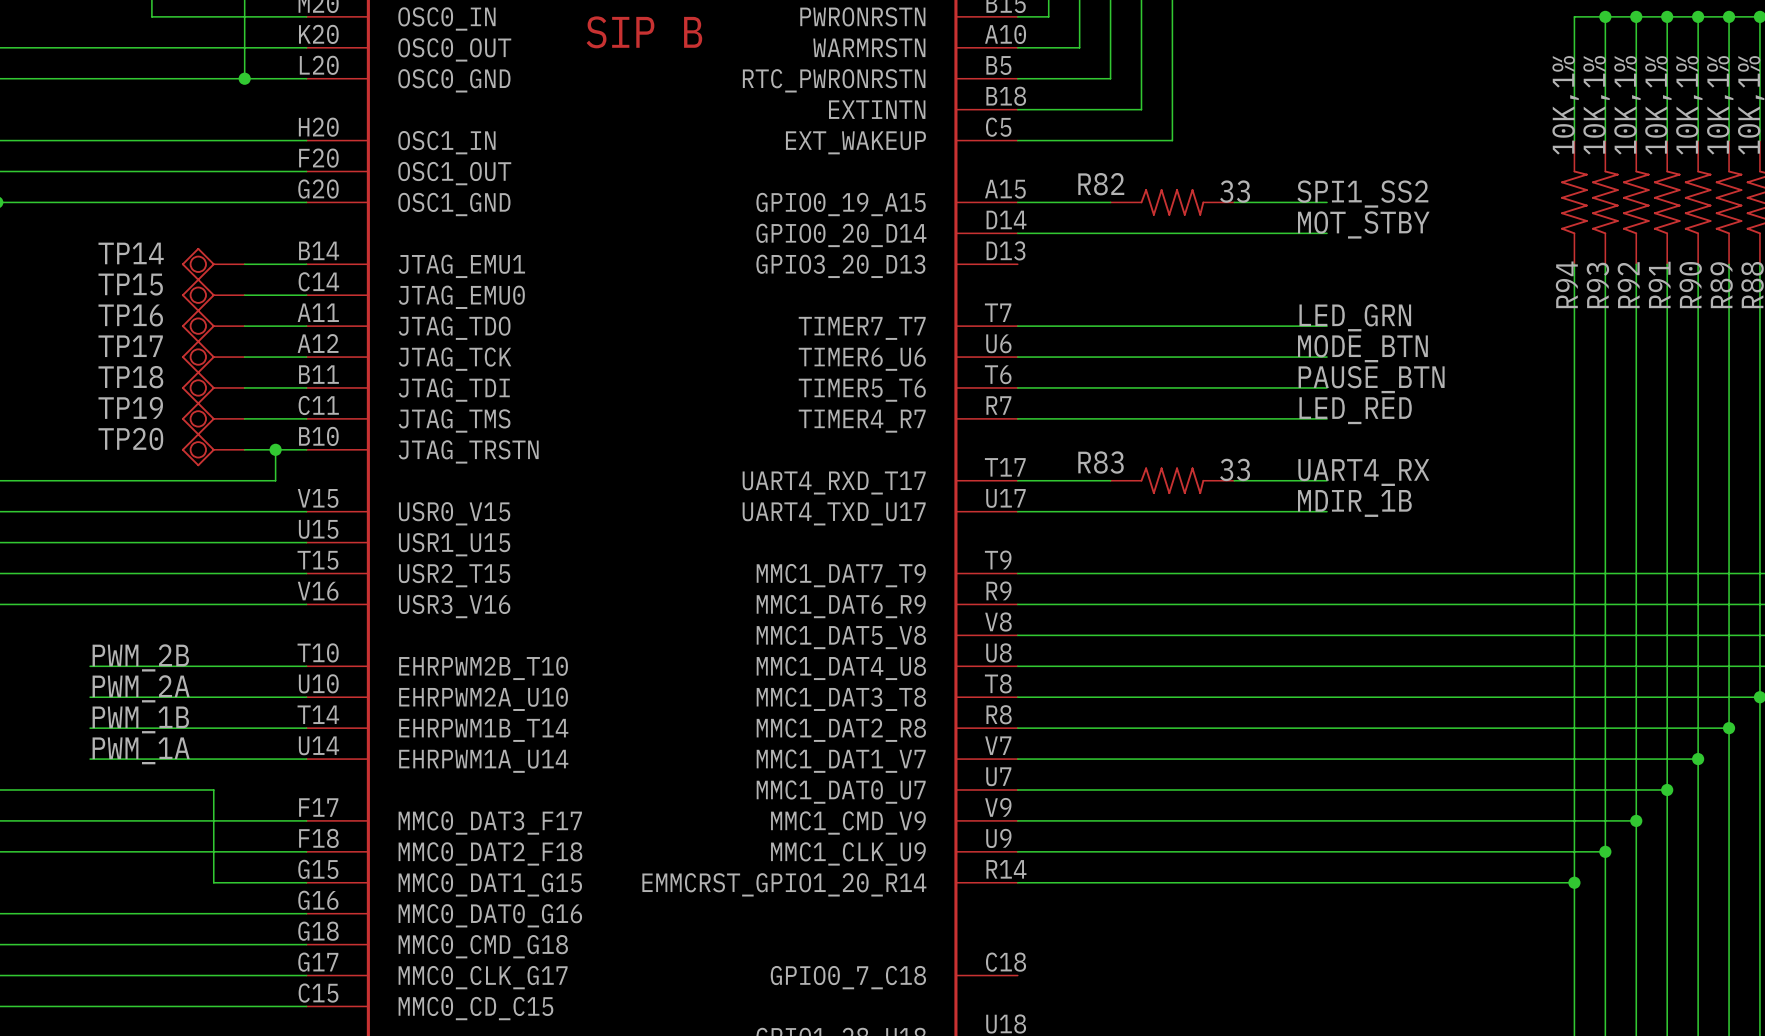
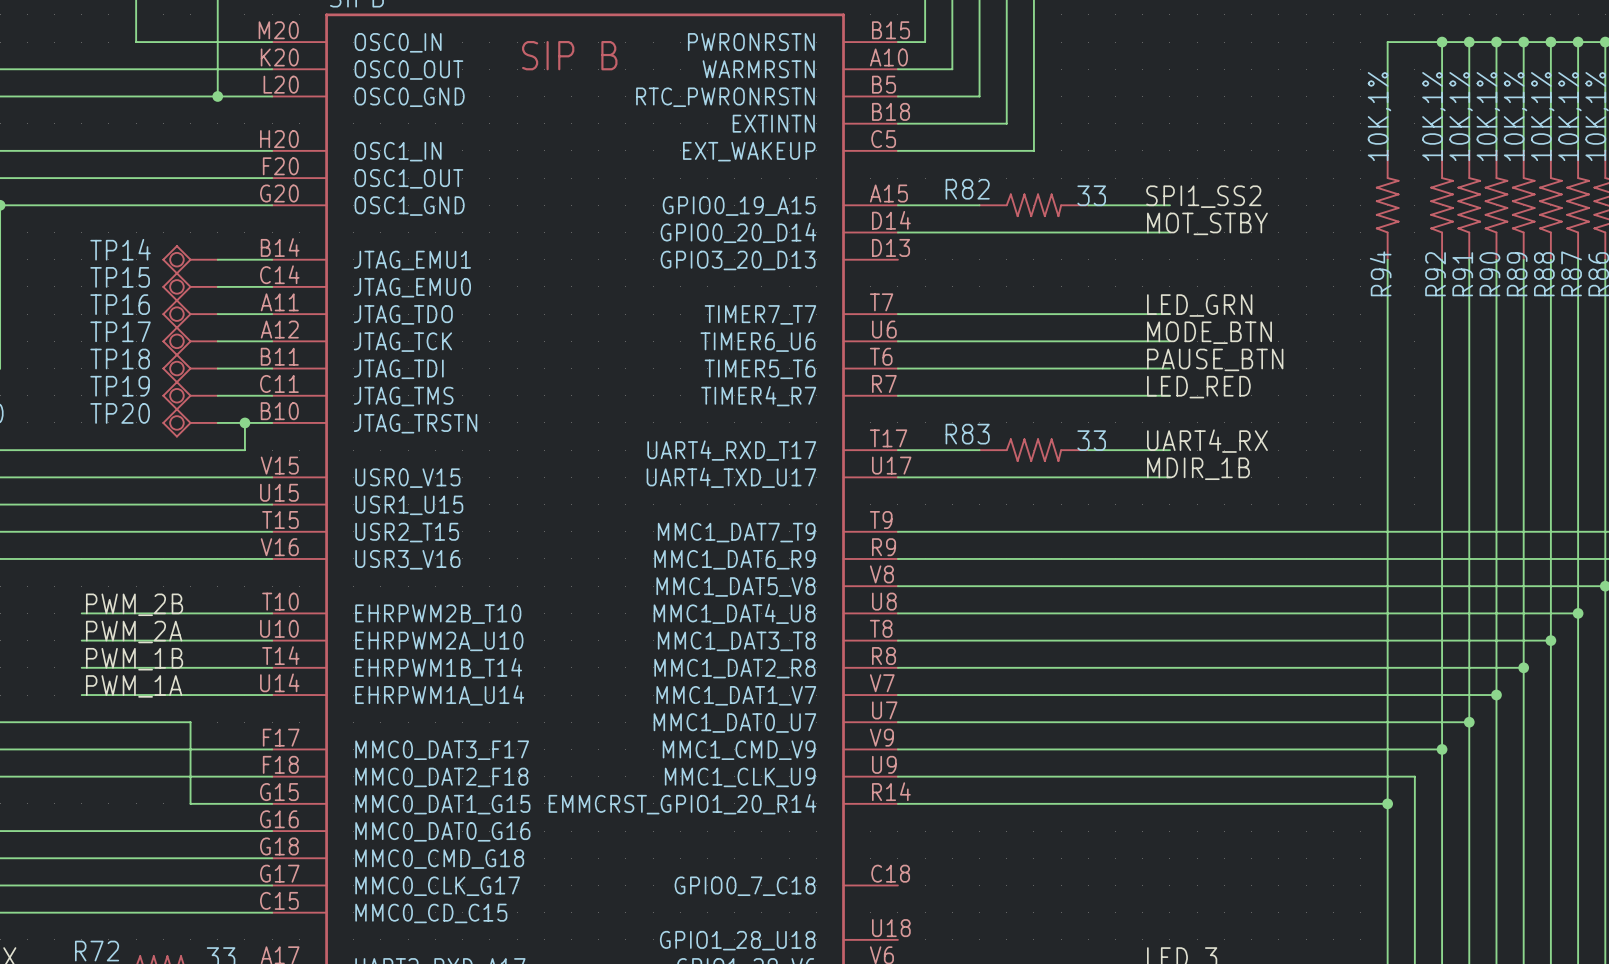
wire: (1605, 16) (1605, 140) -> none
junction: (1605, 16) -> none
R93: 10K,1% (1605, 202) -> none
wire: (1605, 264) (1605, 851) -> none
junction: (1605, 851) -> none

